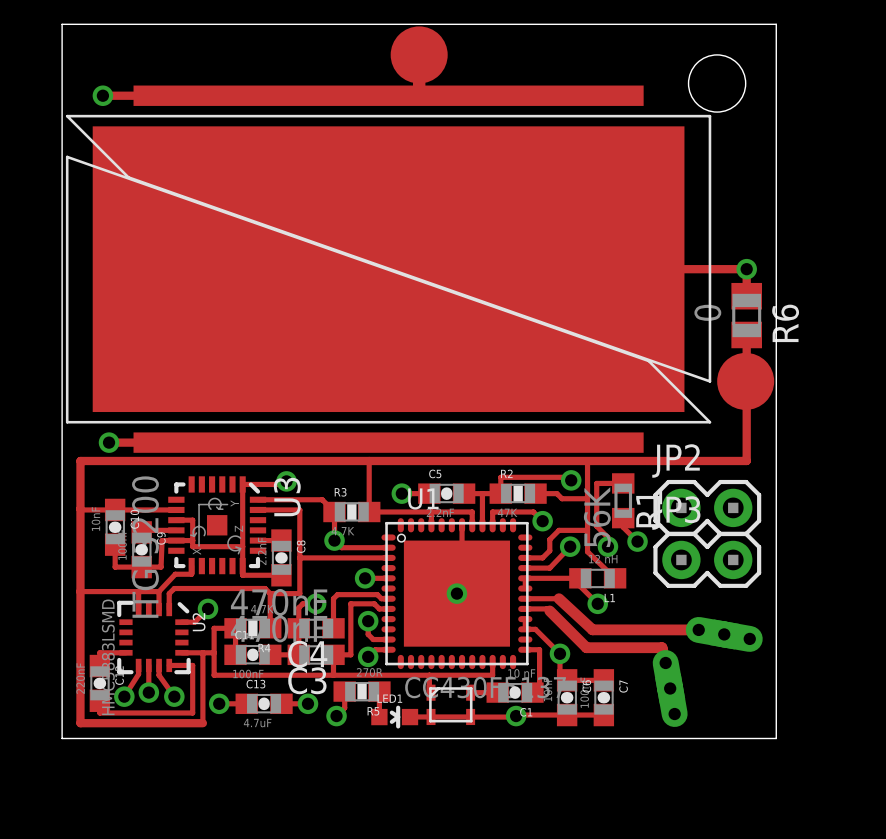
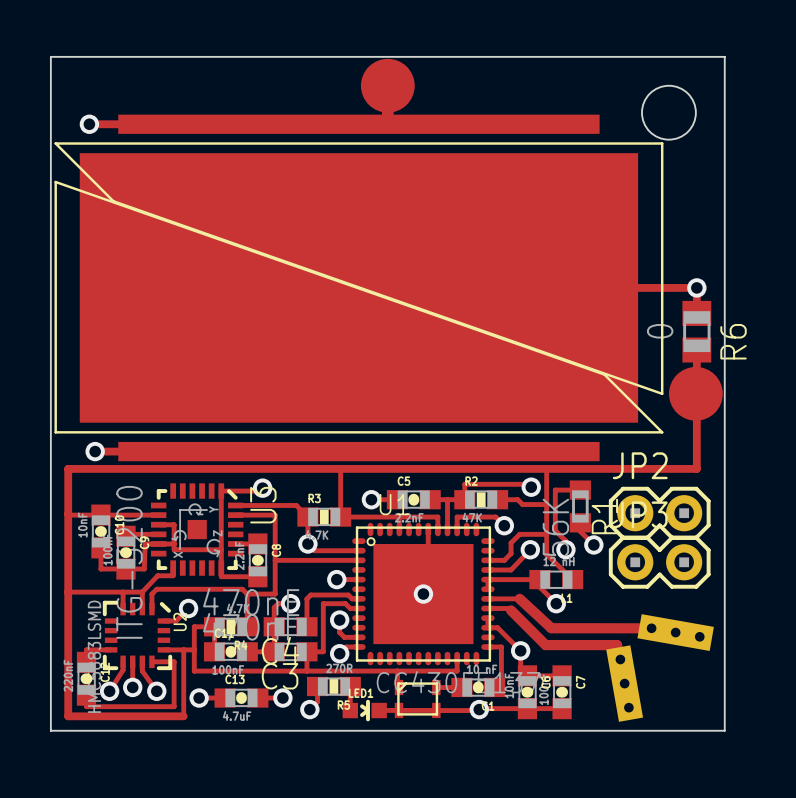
part footprint: [685, 616, 763, 652] -> [637, 614, 714, 651]
part footprint: [652, 650, 688, 727] -> [606, 645, 644, 722]

